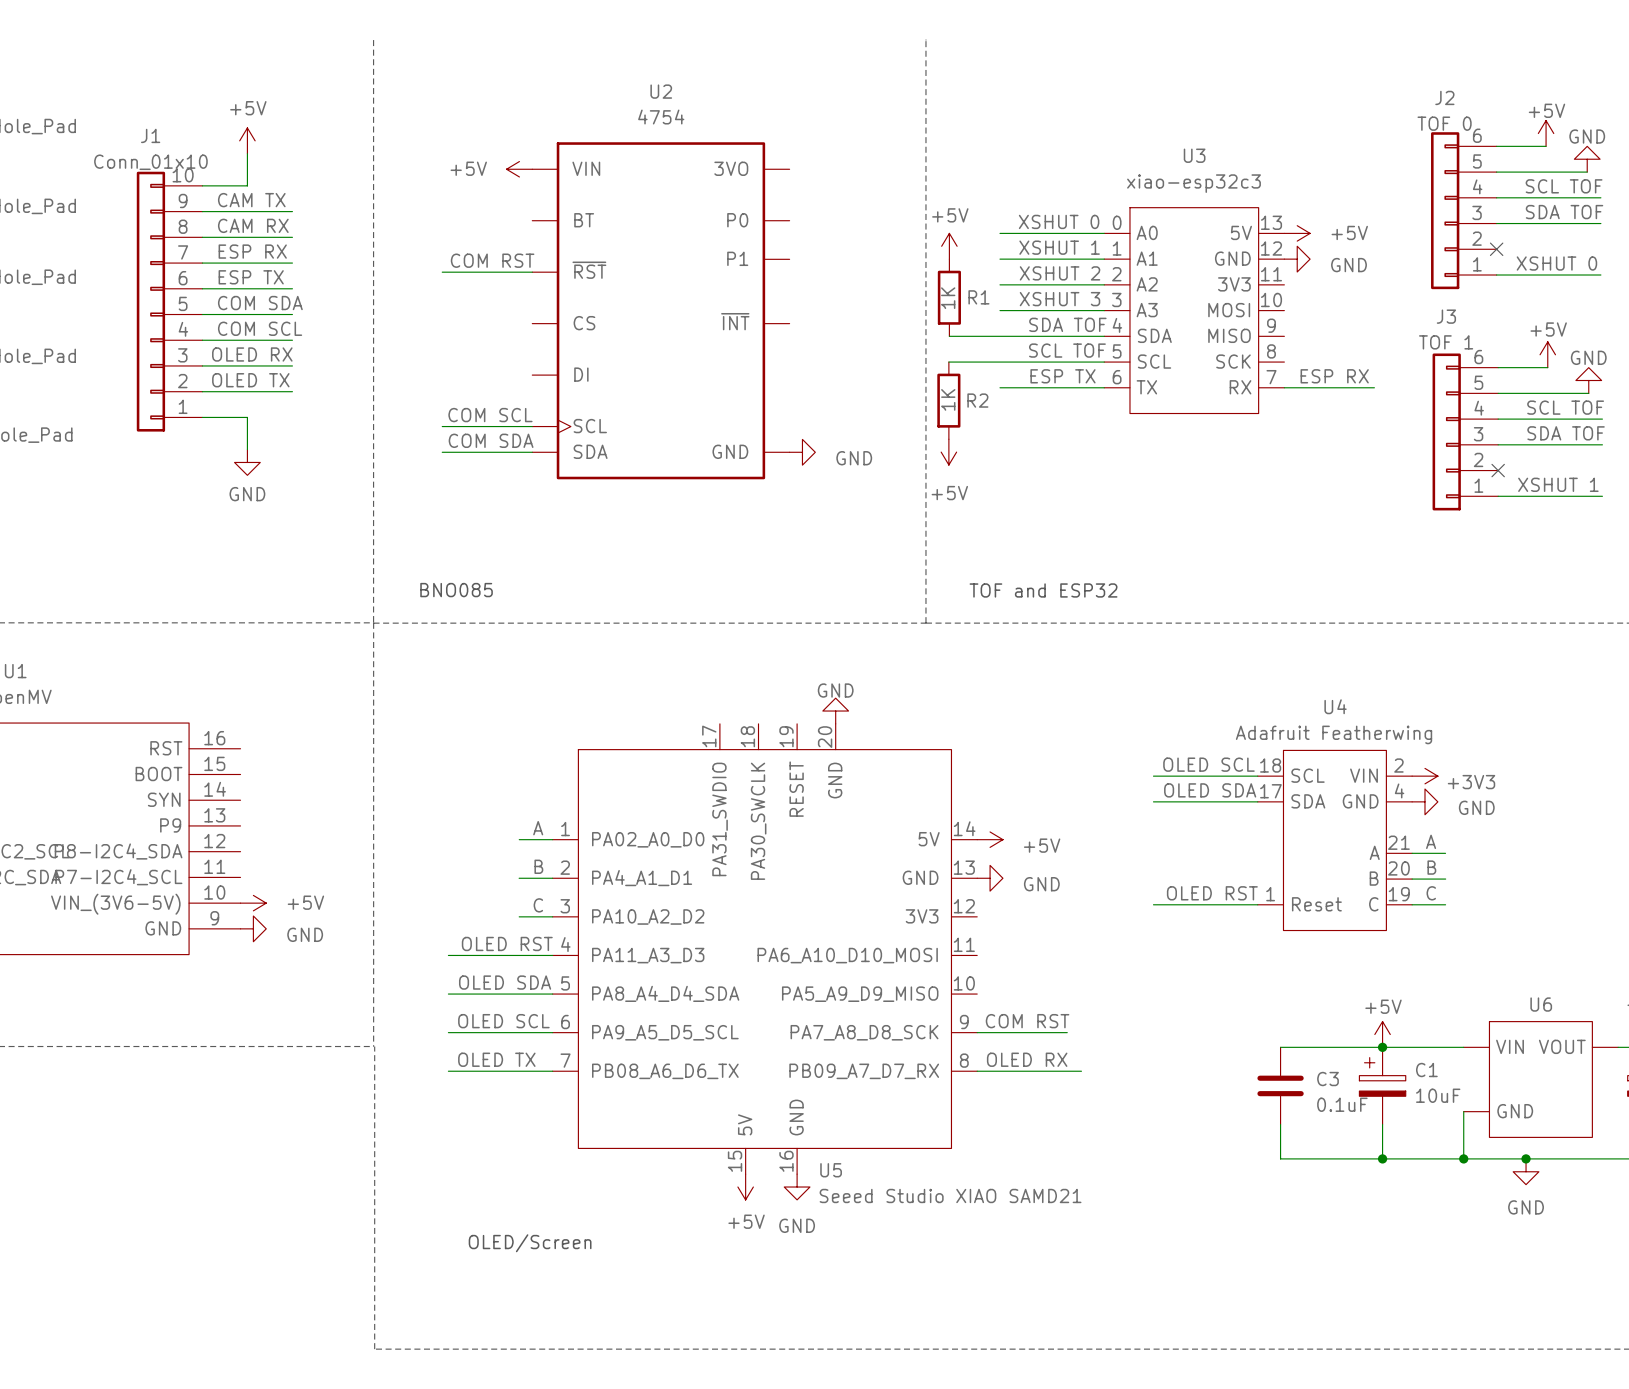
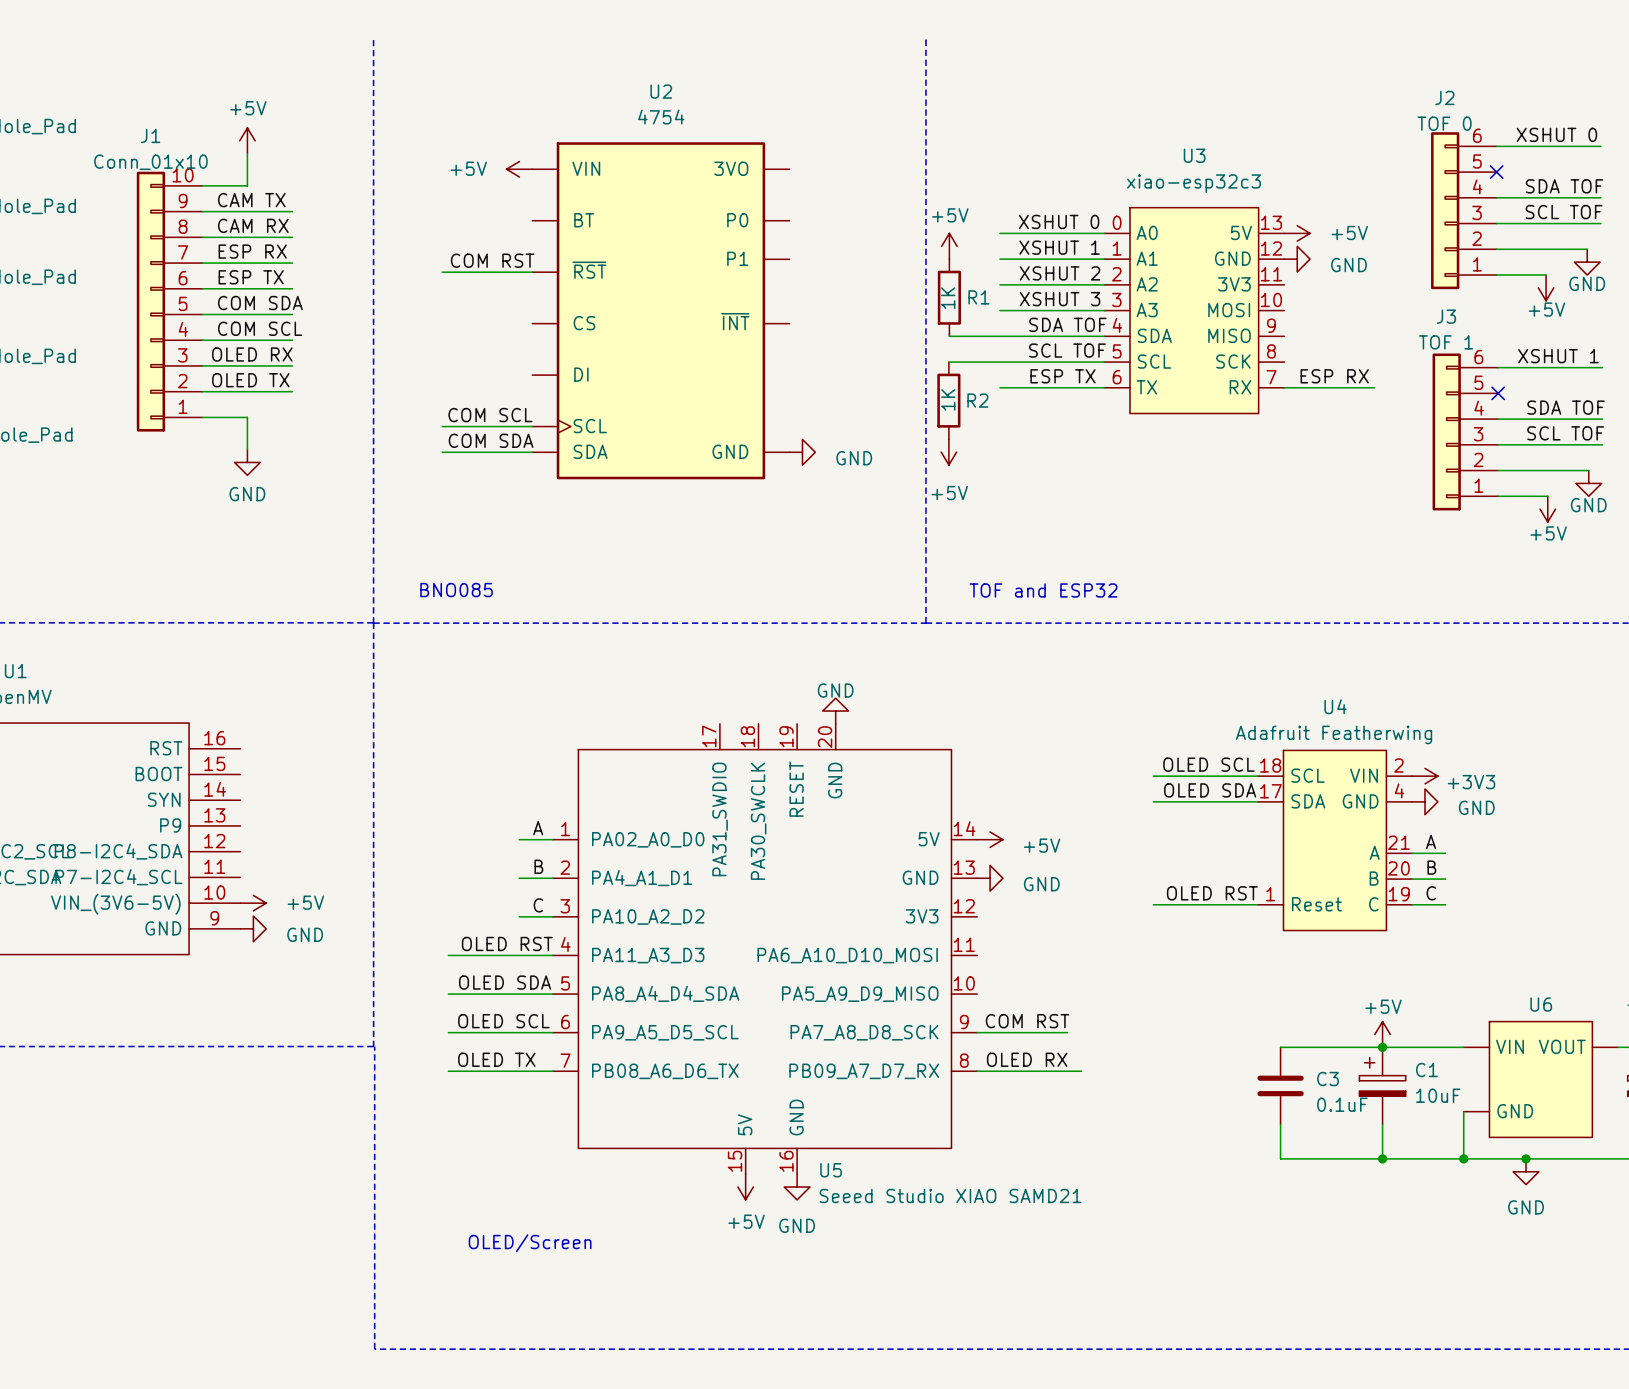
power symbol: +5V (1546, 133) -> none
power symbol: GND (1587, 159) -> none
wire: (1496, 172) (1587, 172) -> (1496, 249) (1587, 249)
no-connect mark: none -> (1496, 172)
label: SCL TOF (1564, 186) -> SDA TOF (1564, 186)
label: SDA TOF (1564, 212) -> SCL TOF (1564, 212)
no-connect mark: (1496, 249) -> none
power symbol: none -> GND (1587, 262)
label position: XSHUT 0 (1556, 263) -> XSHUT 0 (1556, 134)
wire: (1546, 275) (1600, 275) -> (1546, 146) (1600, 146)
power symbol rotation: 0° (1547, 354) -> 180° (1546, 287)
power symbol position: +5V (1547, 354) -> +5V (1546, 287)
power symbol: GND (1588, 380) -> none
wire: (1498, 393) (1588, 393) -> (1498, 470) (1588, 470)
no-connect mark: none -> (1498, 393)
label: SCL TOF (1565, 407) -> SDA TOF (1566, 407)
label: SDA TOF (1566, 433) -> SCL TOF (1565, 433)
no-connect mark: (1498, 470) -> none
power symbol: none -> GND (1588, 483)
label position: XSHUT 1 (1558, 484) -> XSHUT 1 (1558, 356)
wire: (1547, 496) (1602, 496) -> (1547, 367) (1602, 367)
power symbol: none -> +5V (1547, 509)

